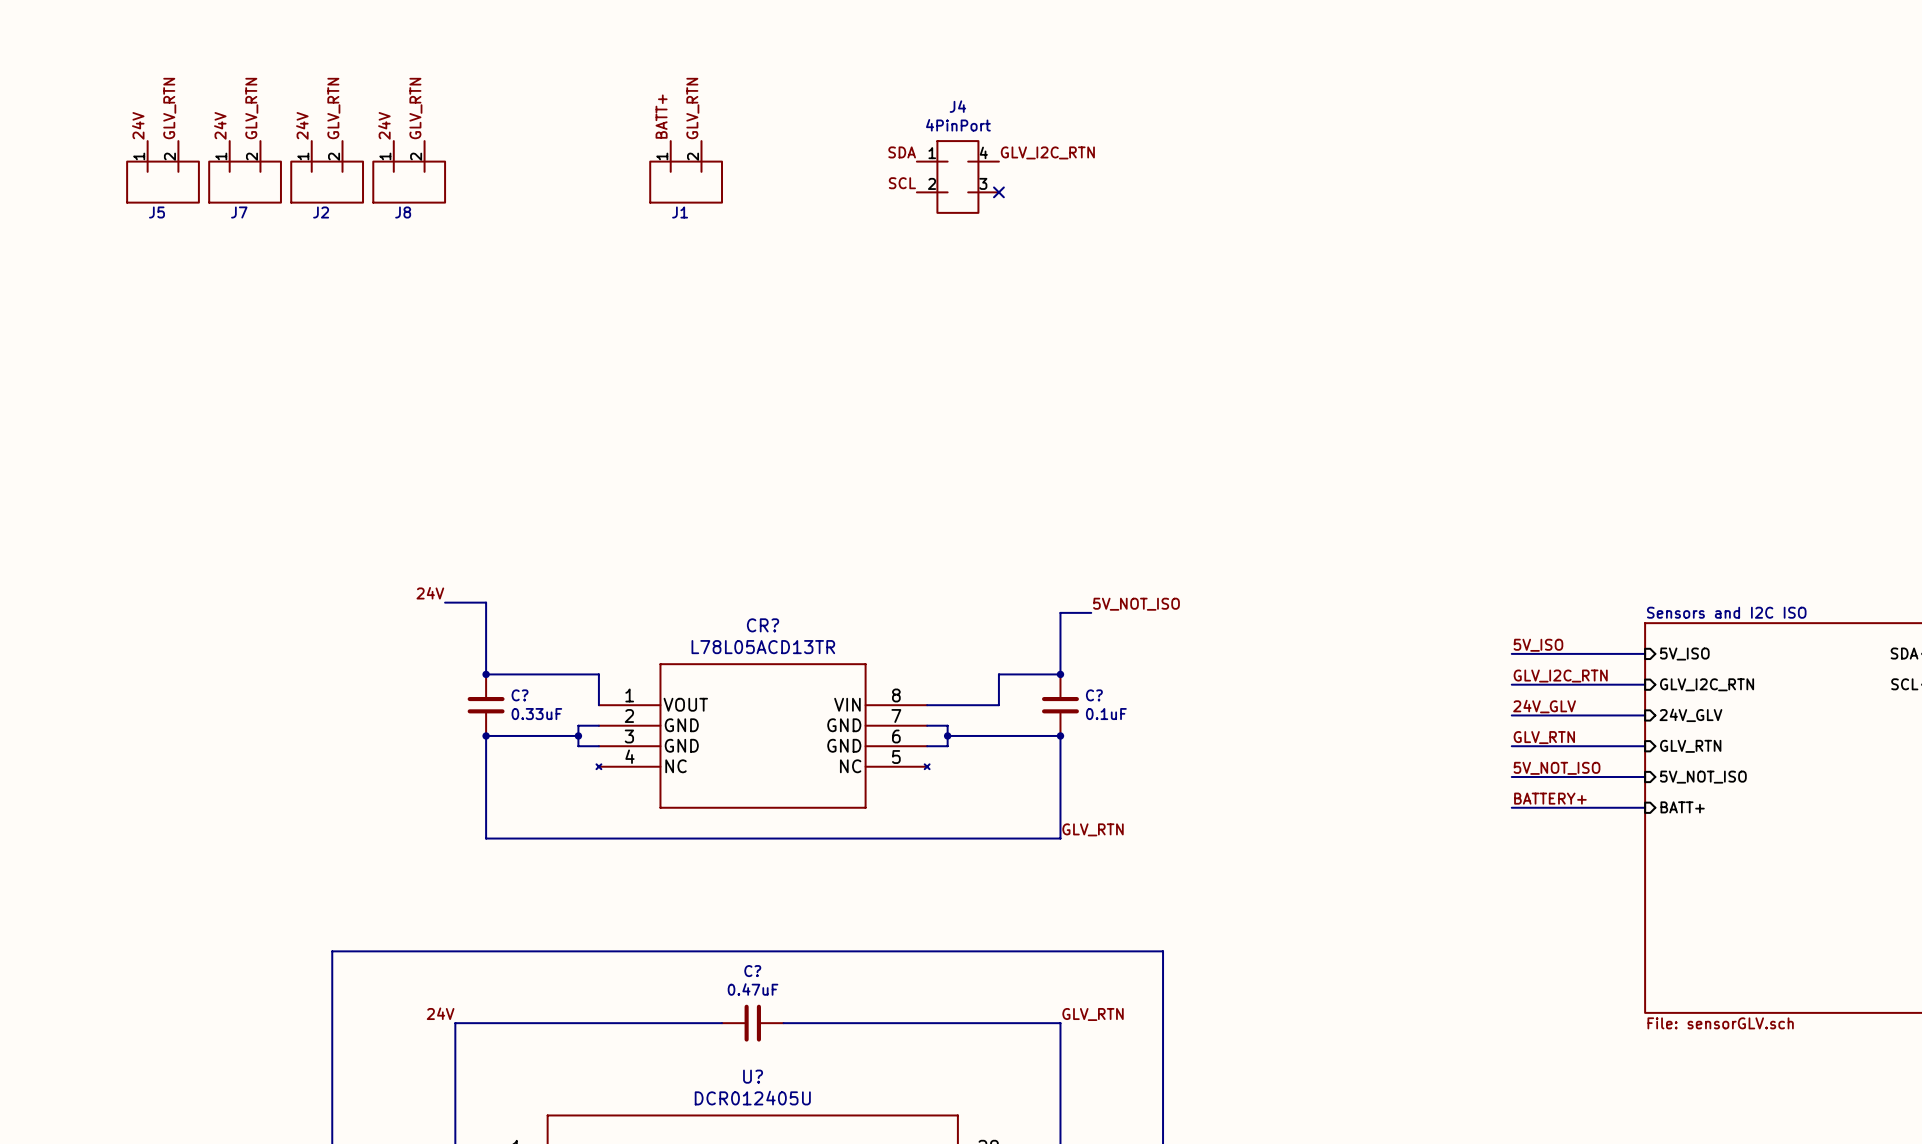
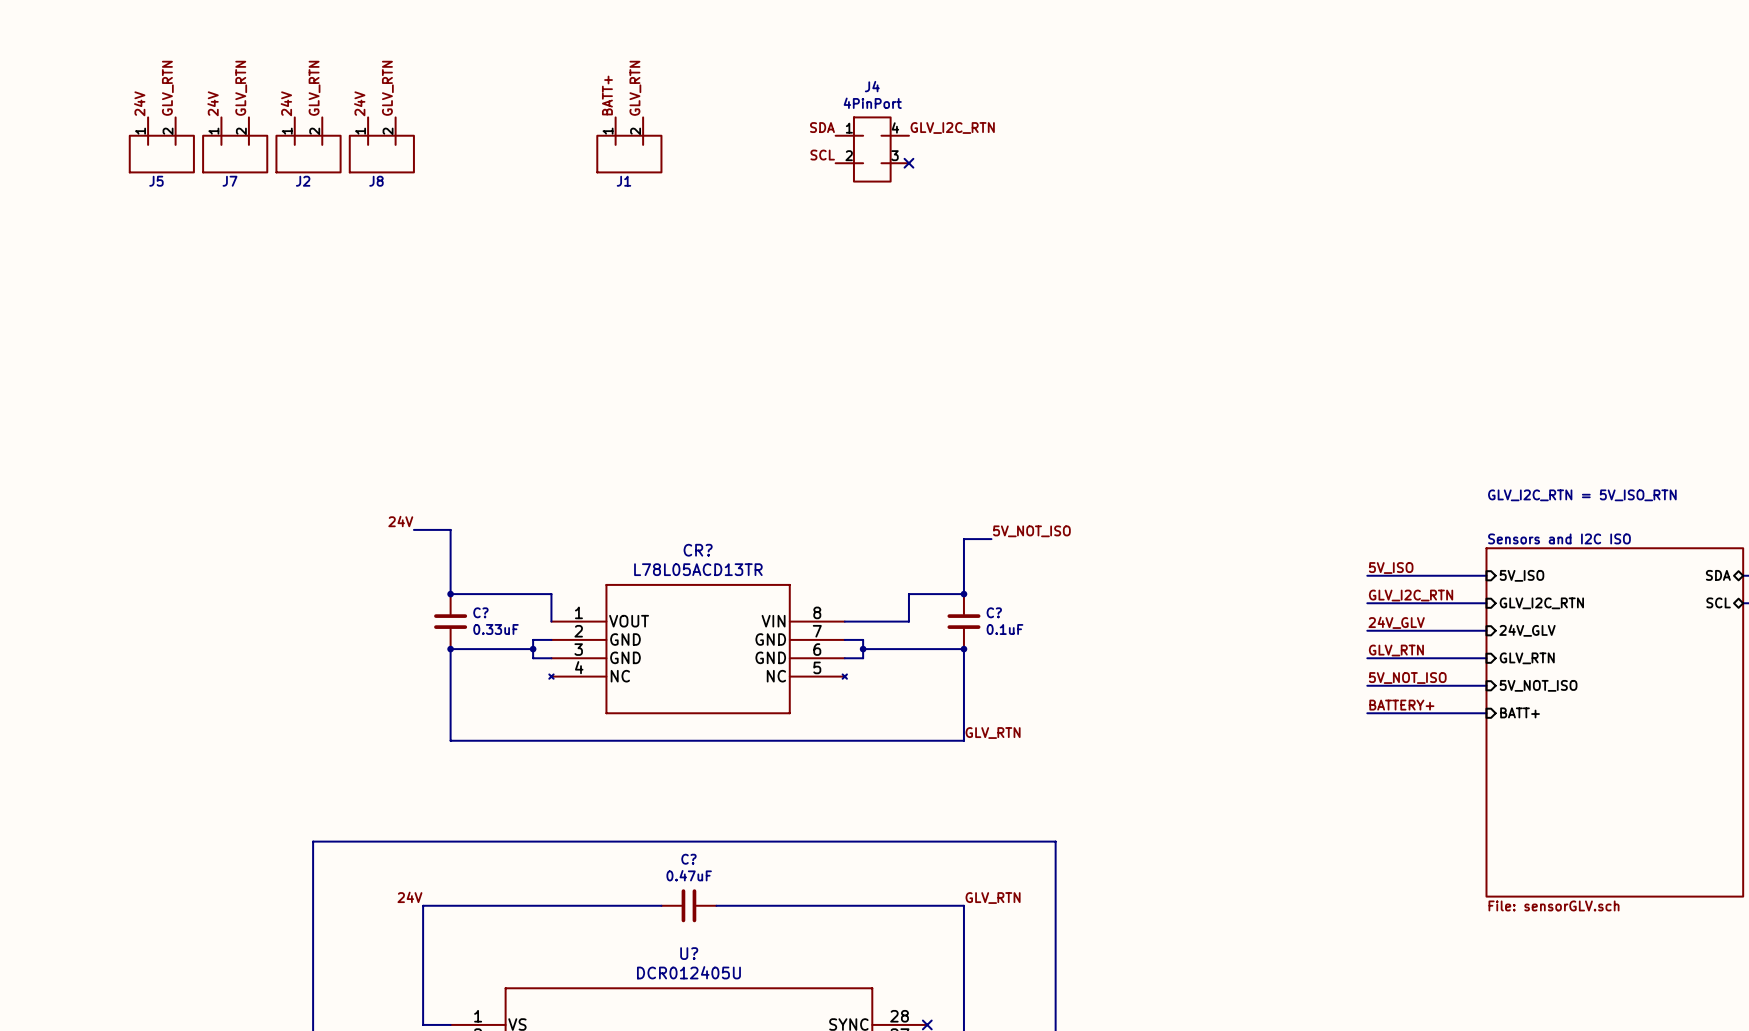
text: none -> GLV_I2C_RTN = 5V_ISO_RTN (1582, 495)

